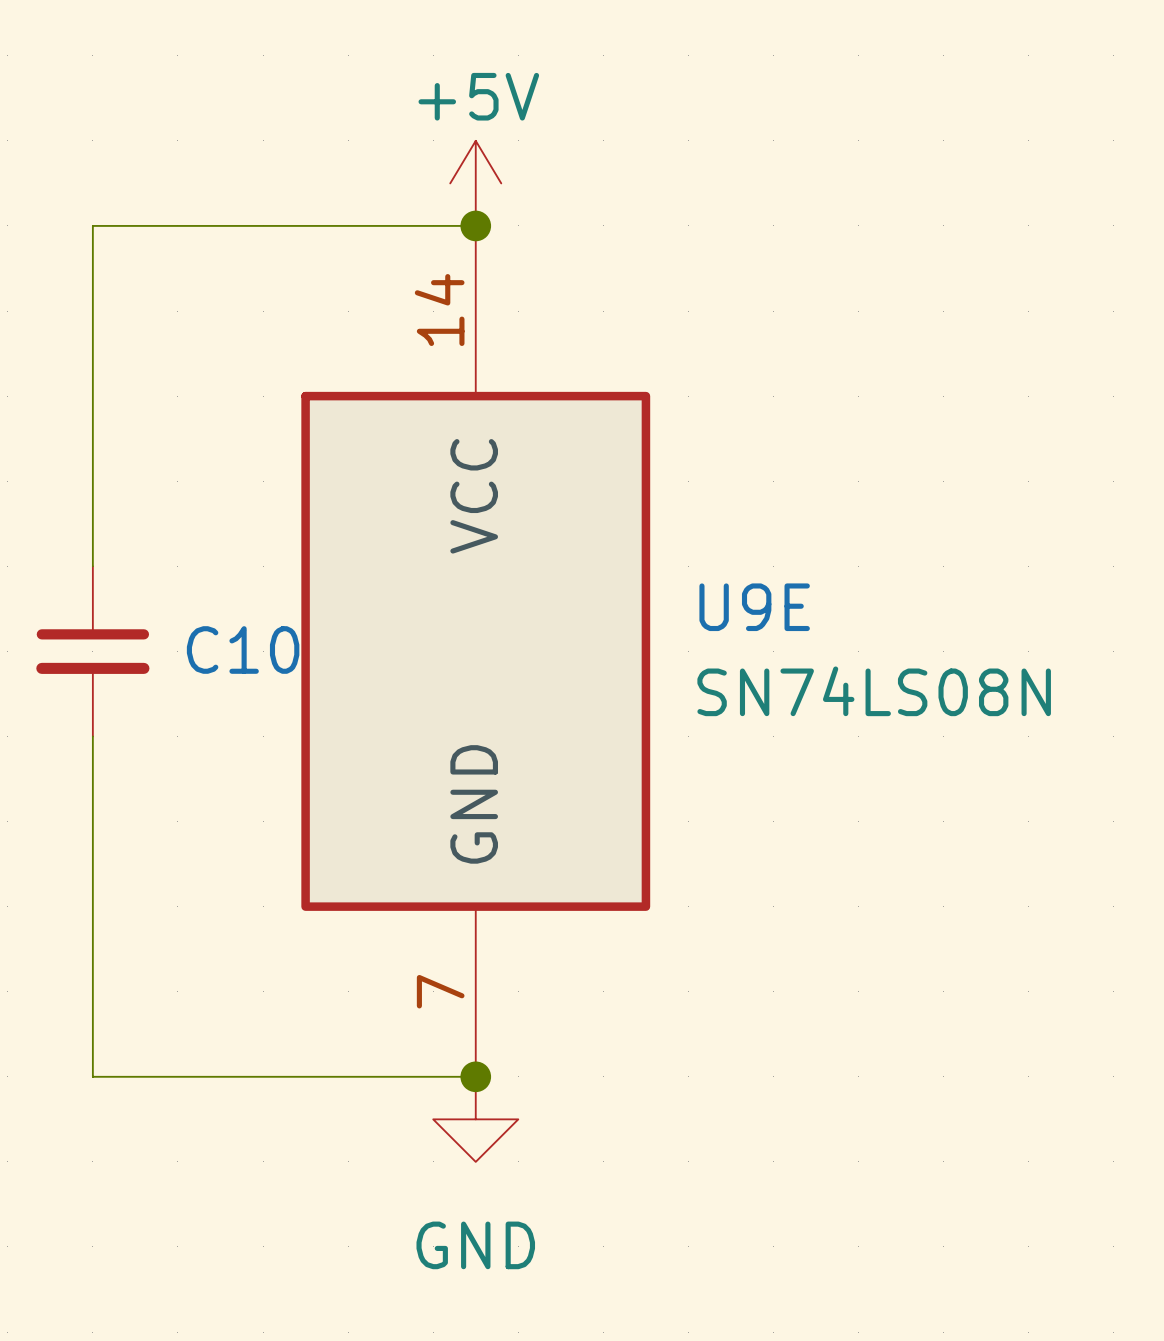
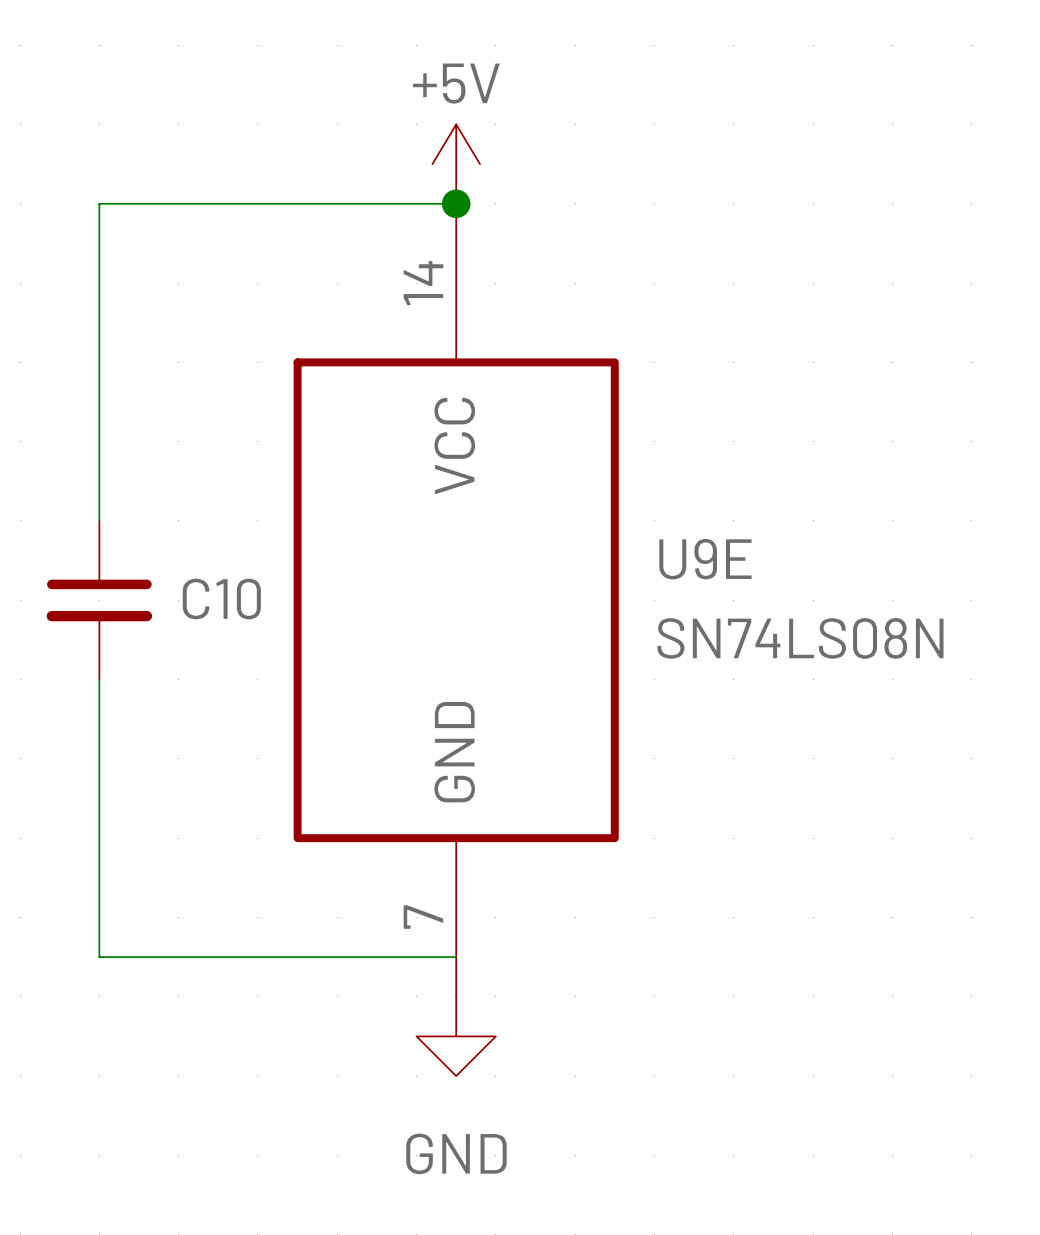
wire: (92, 1034) (92, 1076) (475, 1076) -> (99, 957) (456, 957)
junction: (475, 1076) -> none

